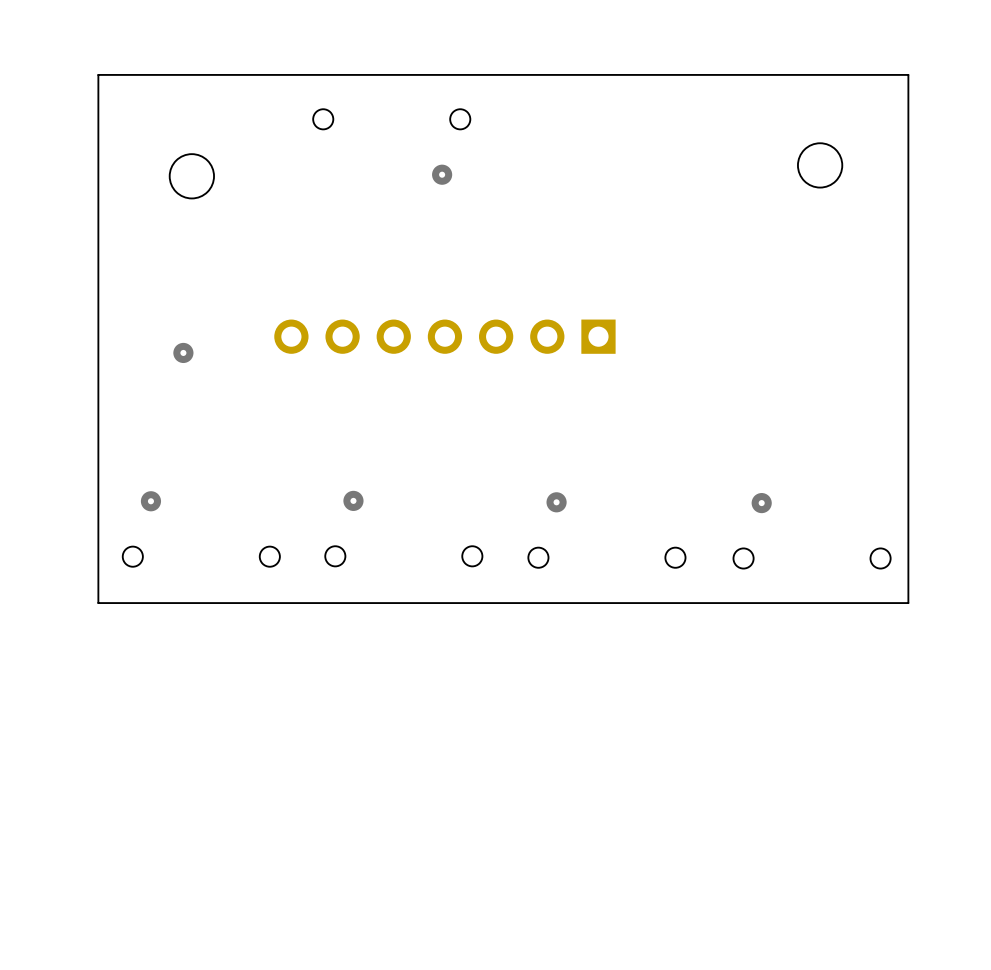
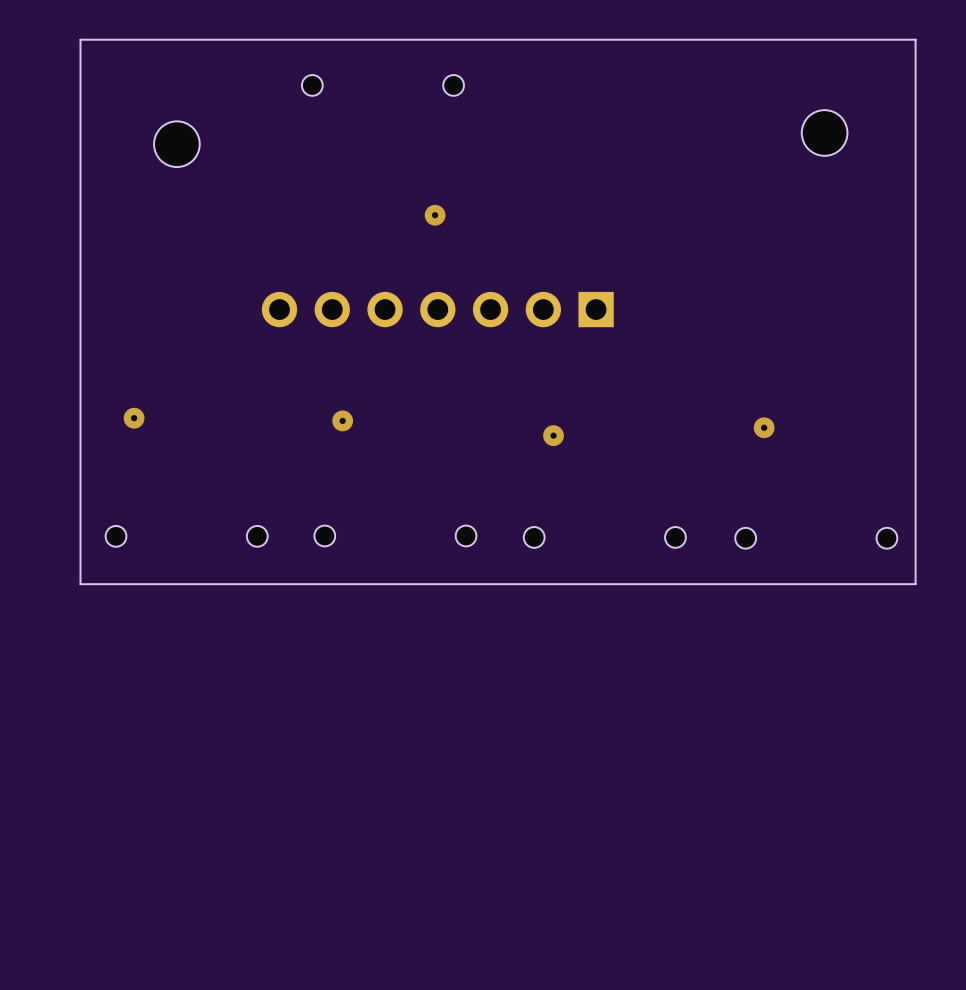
via position: (442, 174) -> (435, 215)
via: (183, 352) -> none
via: none -> (134, 418)
via position: (353, 500) -> (342, 420)
via: (150, 501) -> none
via position: (556, 502) -> (553, 435)
via position: (761, 503) -> (764, 427)

